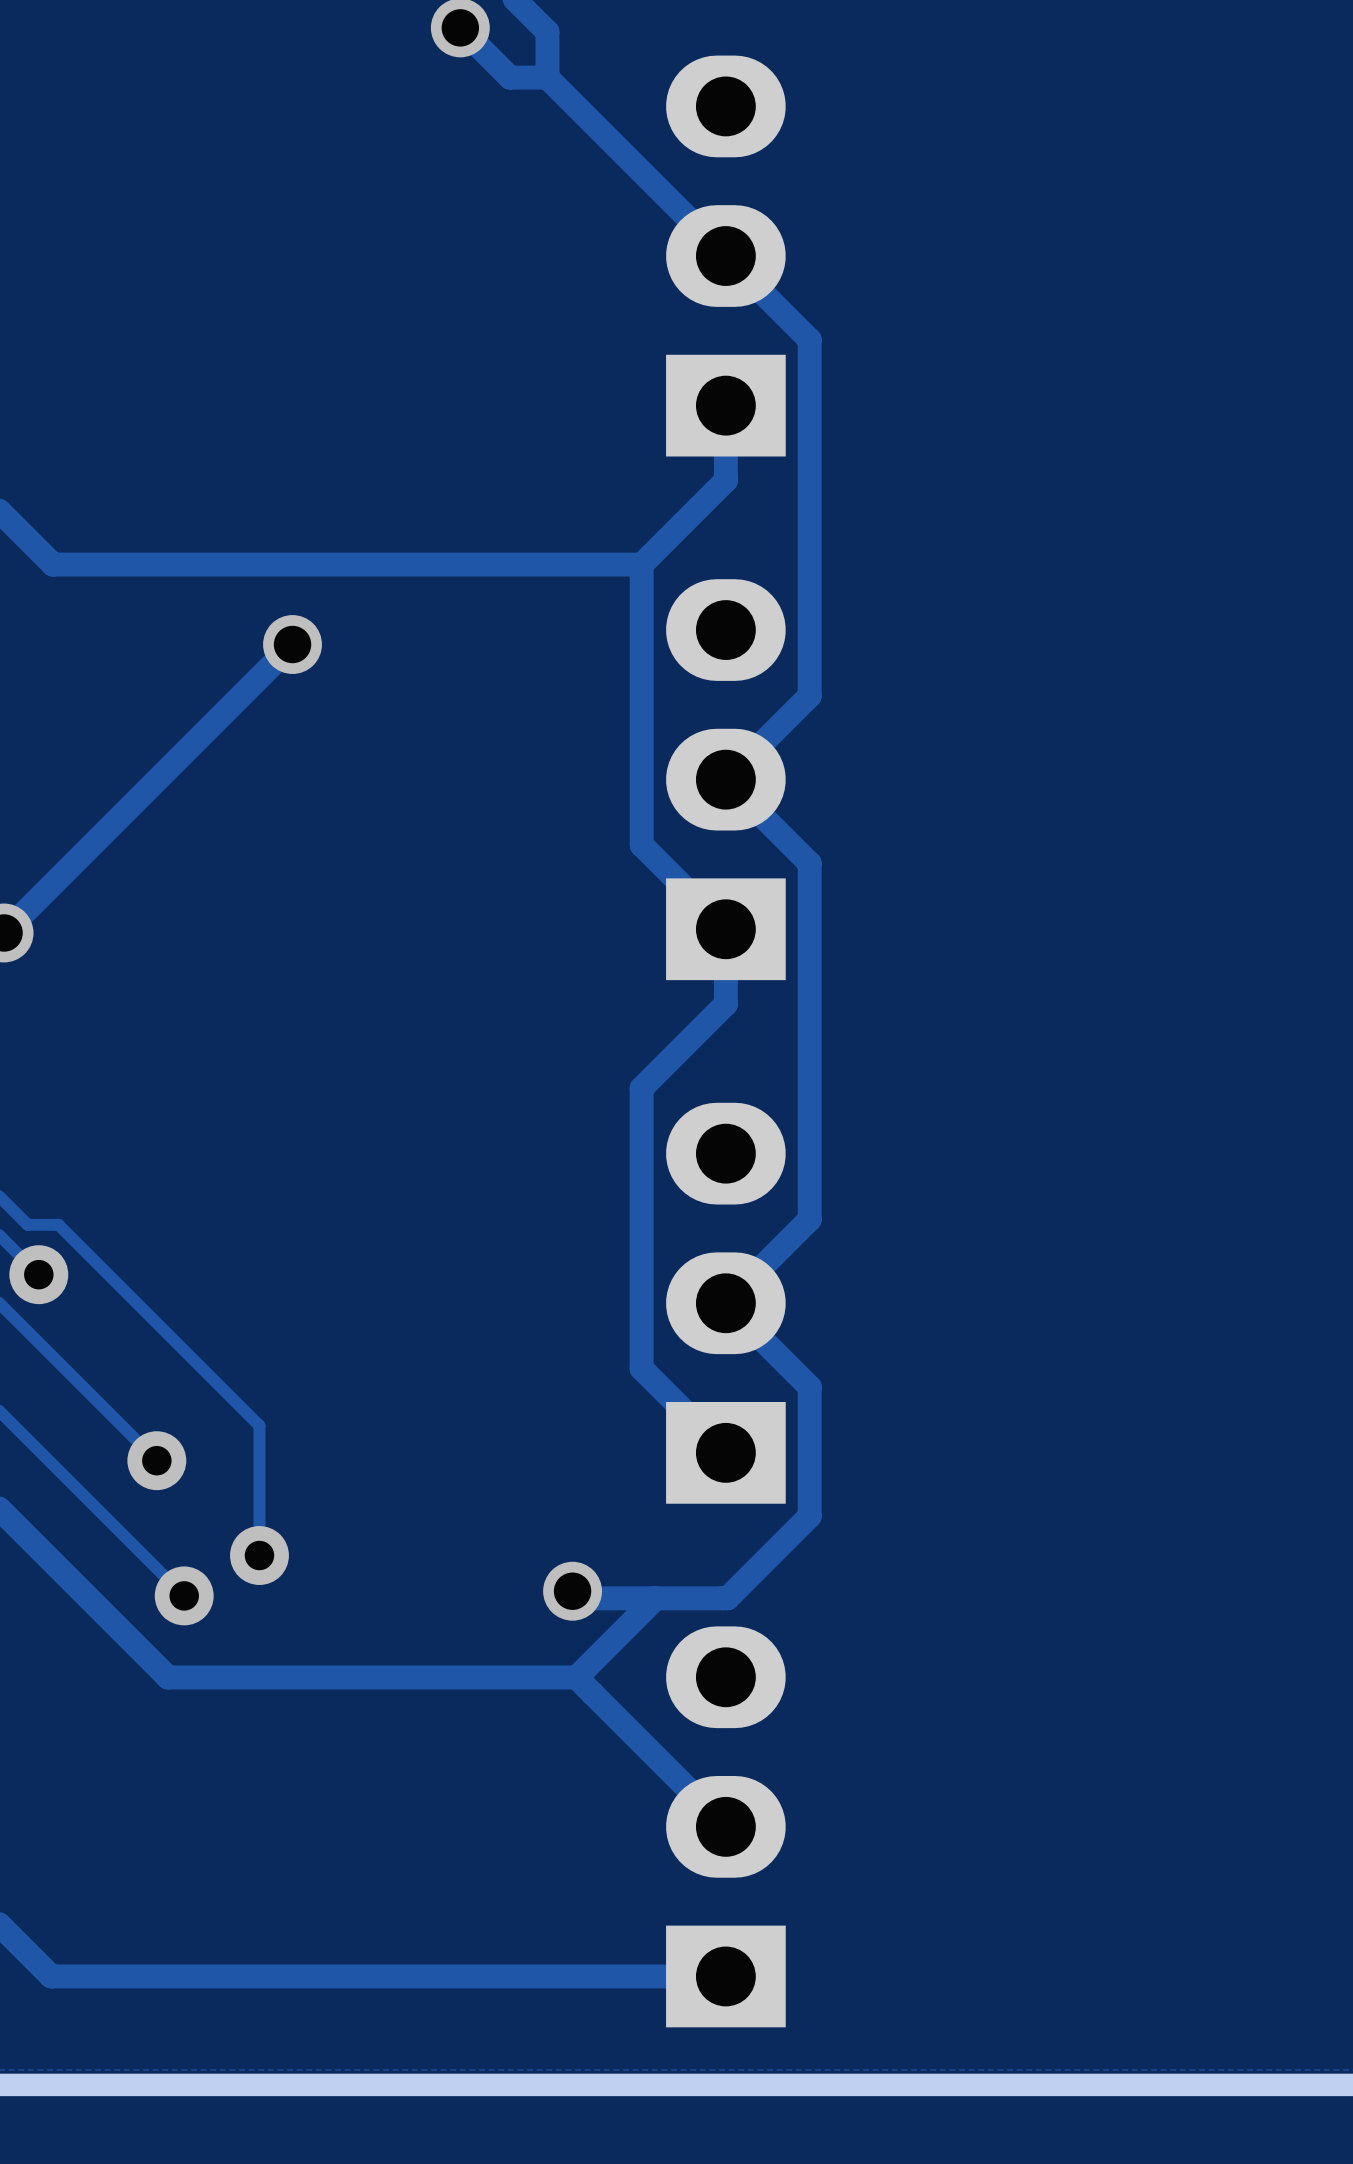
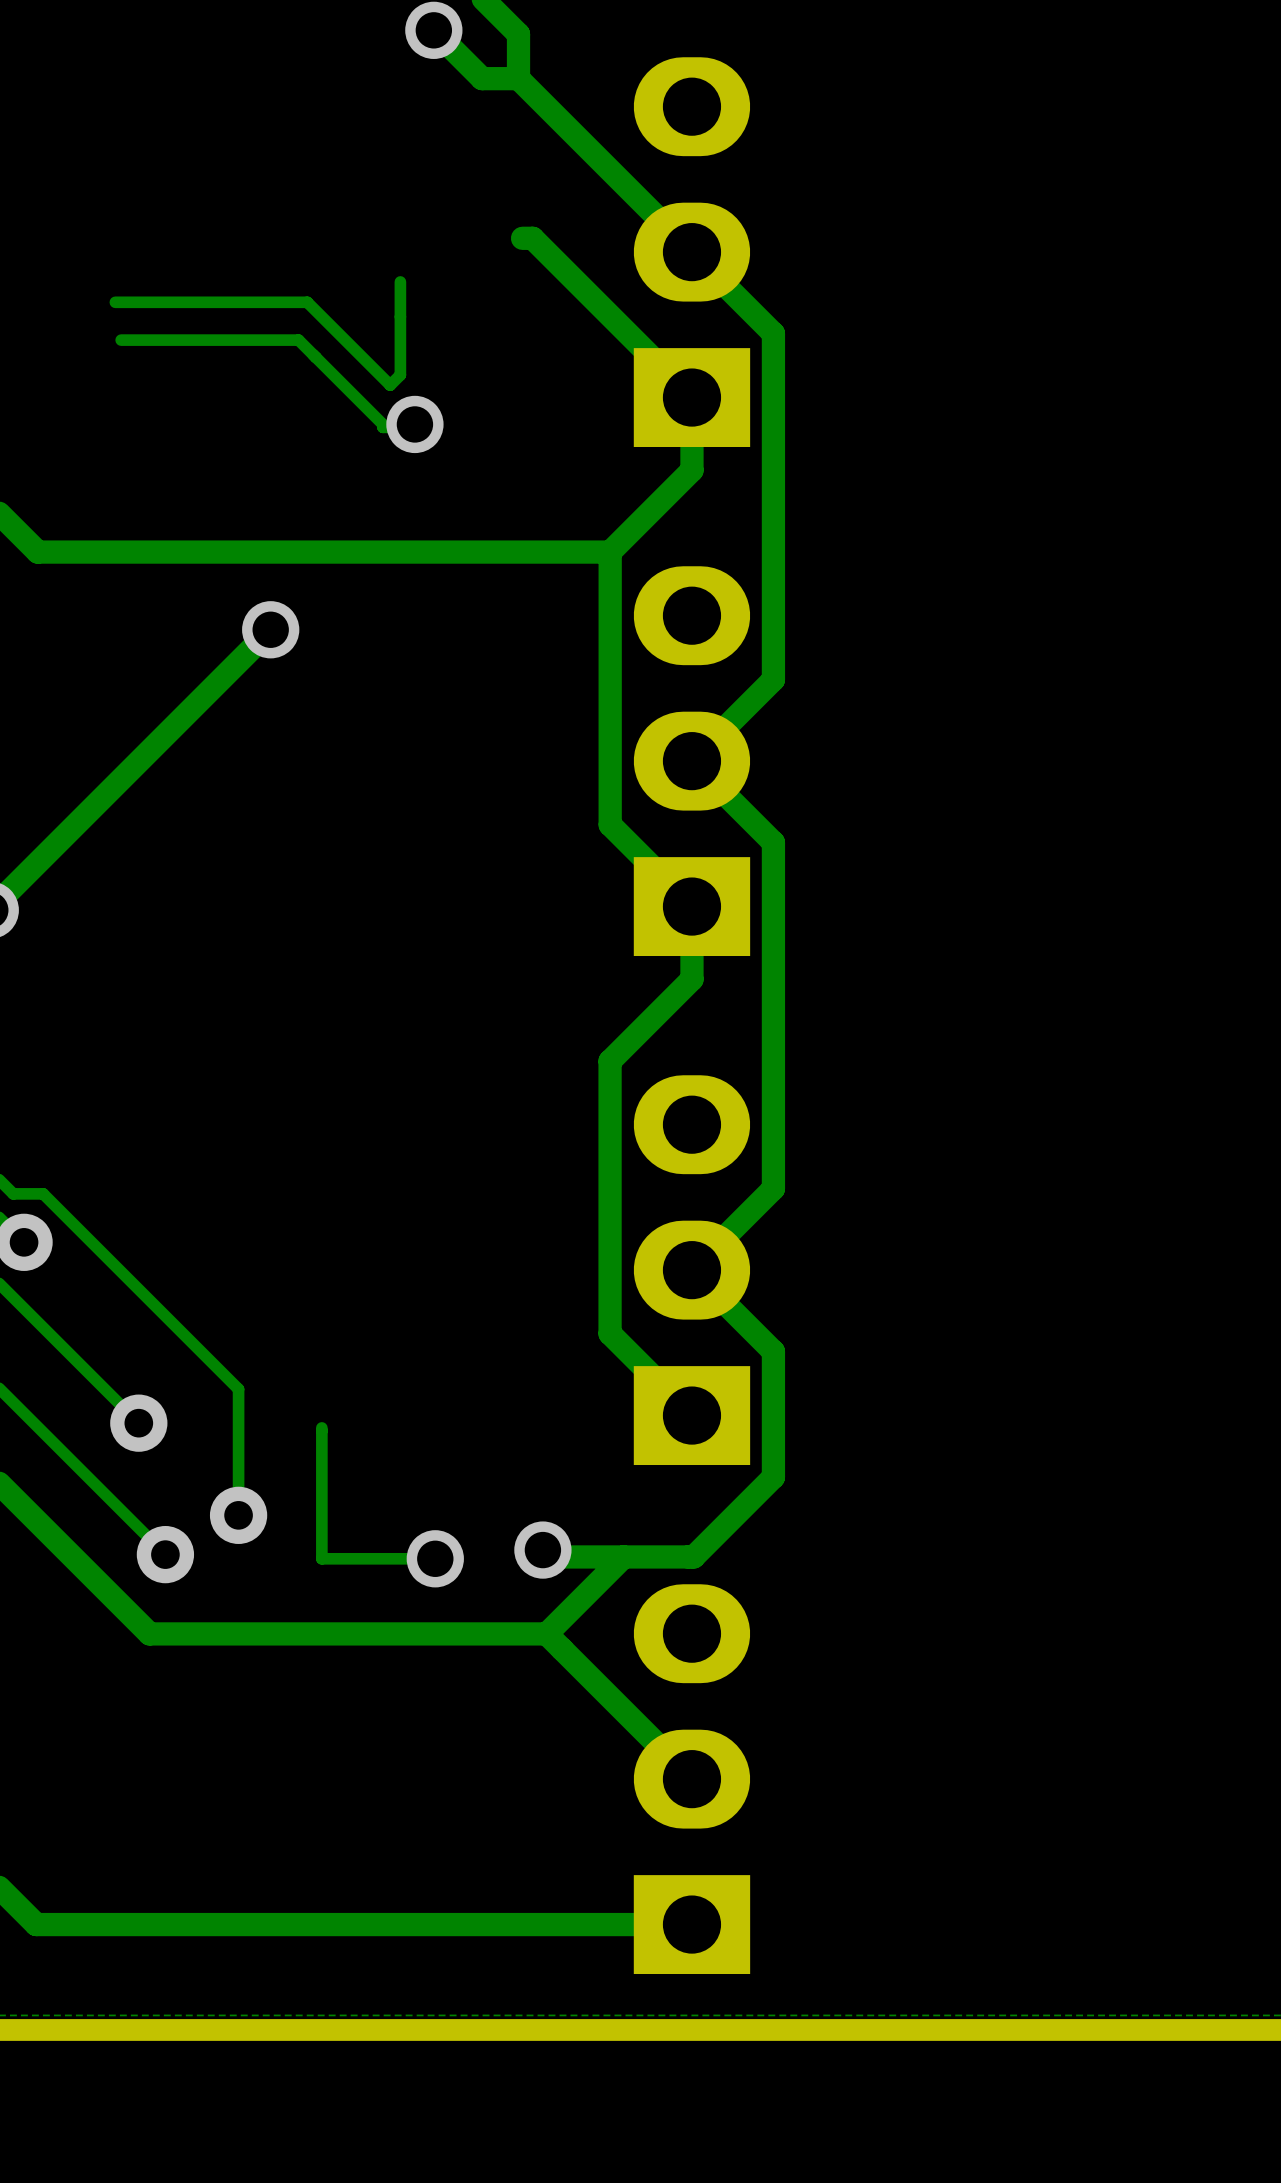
track: none -> (522, 238) (532, 238) (691, 397)
track: none -> (400, 281) (400, 375) (390, 385) (307, 302) (115, 302)
track: none -> (121, 340) (298, 340) (382, 424) (382, 427) (412, 427) (414, 424)
via: none -> (414, 424)
track: none -> (321, 1427) (321, 1558) (435, 1558)
via: none -> (435, 1558)

